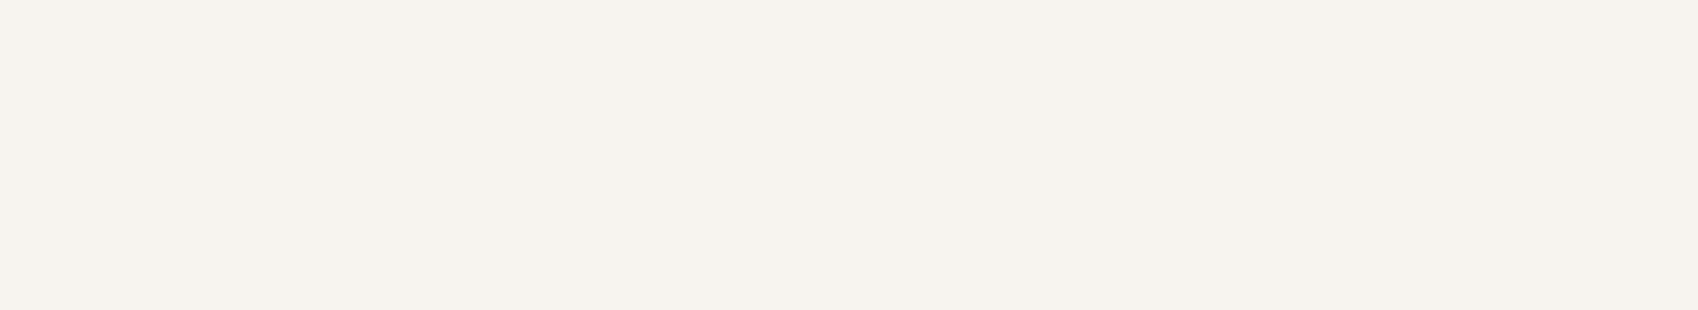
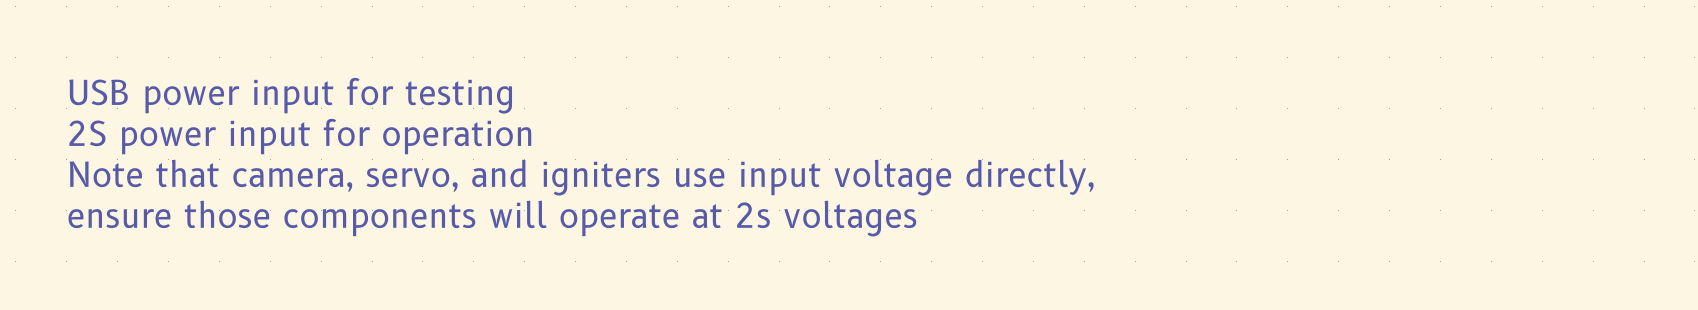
text: none -> USB power input for testing (290, 95)
text: none -> 2S power input for operation (300, 136)
text: none -> Note that camera, servo, and igniters use input voltage directly, (581, 177)
text: none -> ensure those components will operate at 2s voltages (492, 218)

